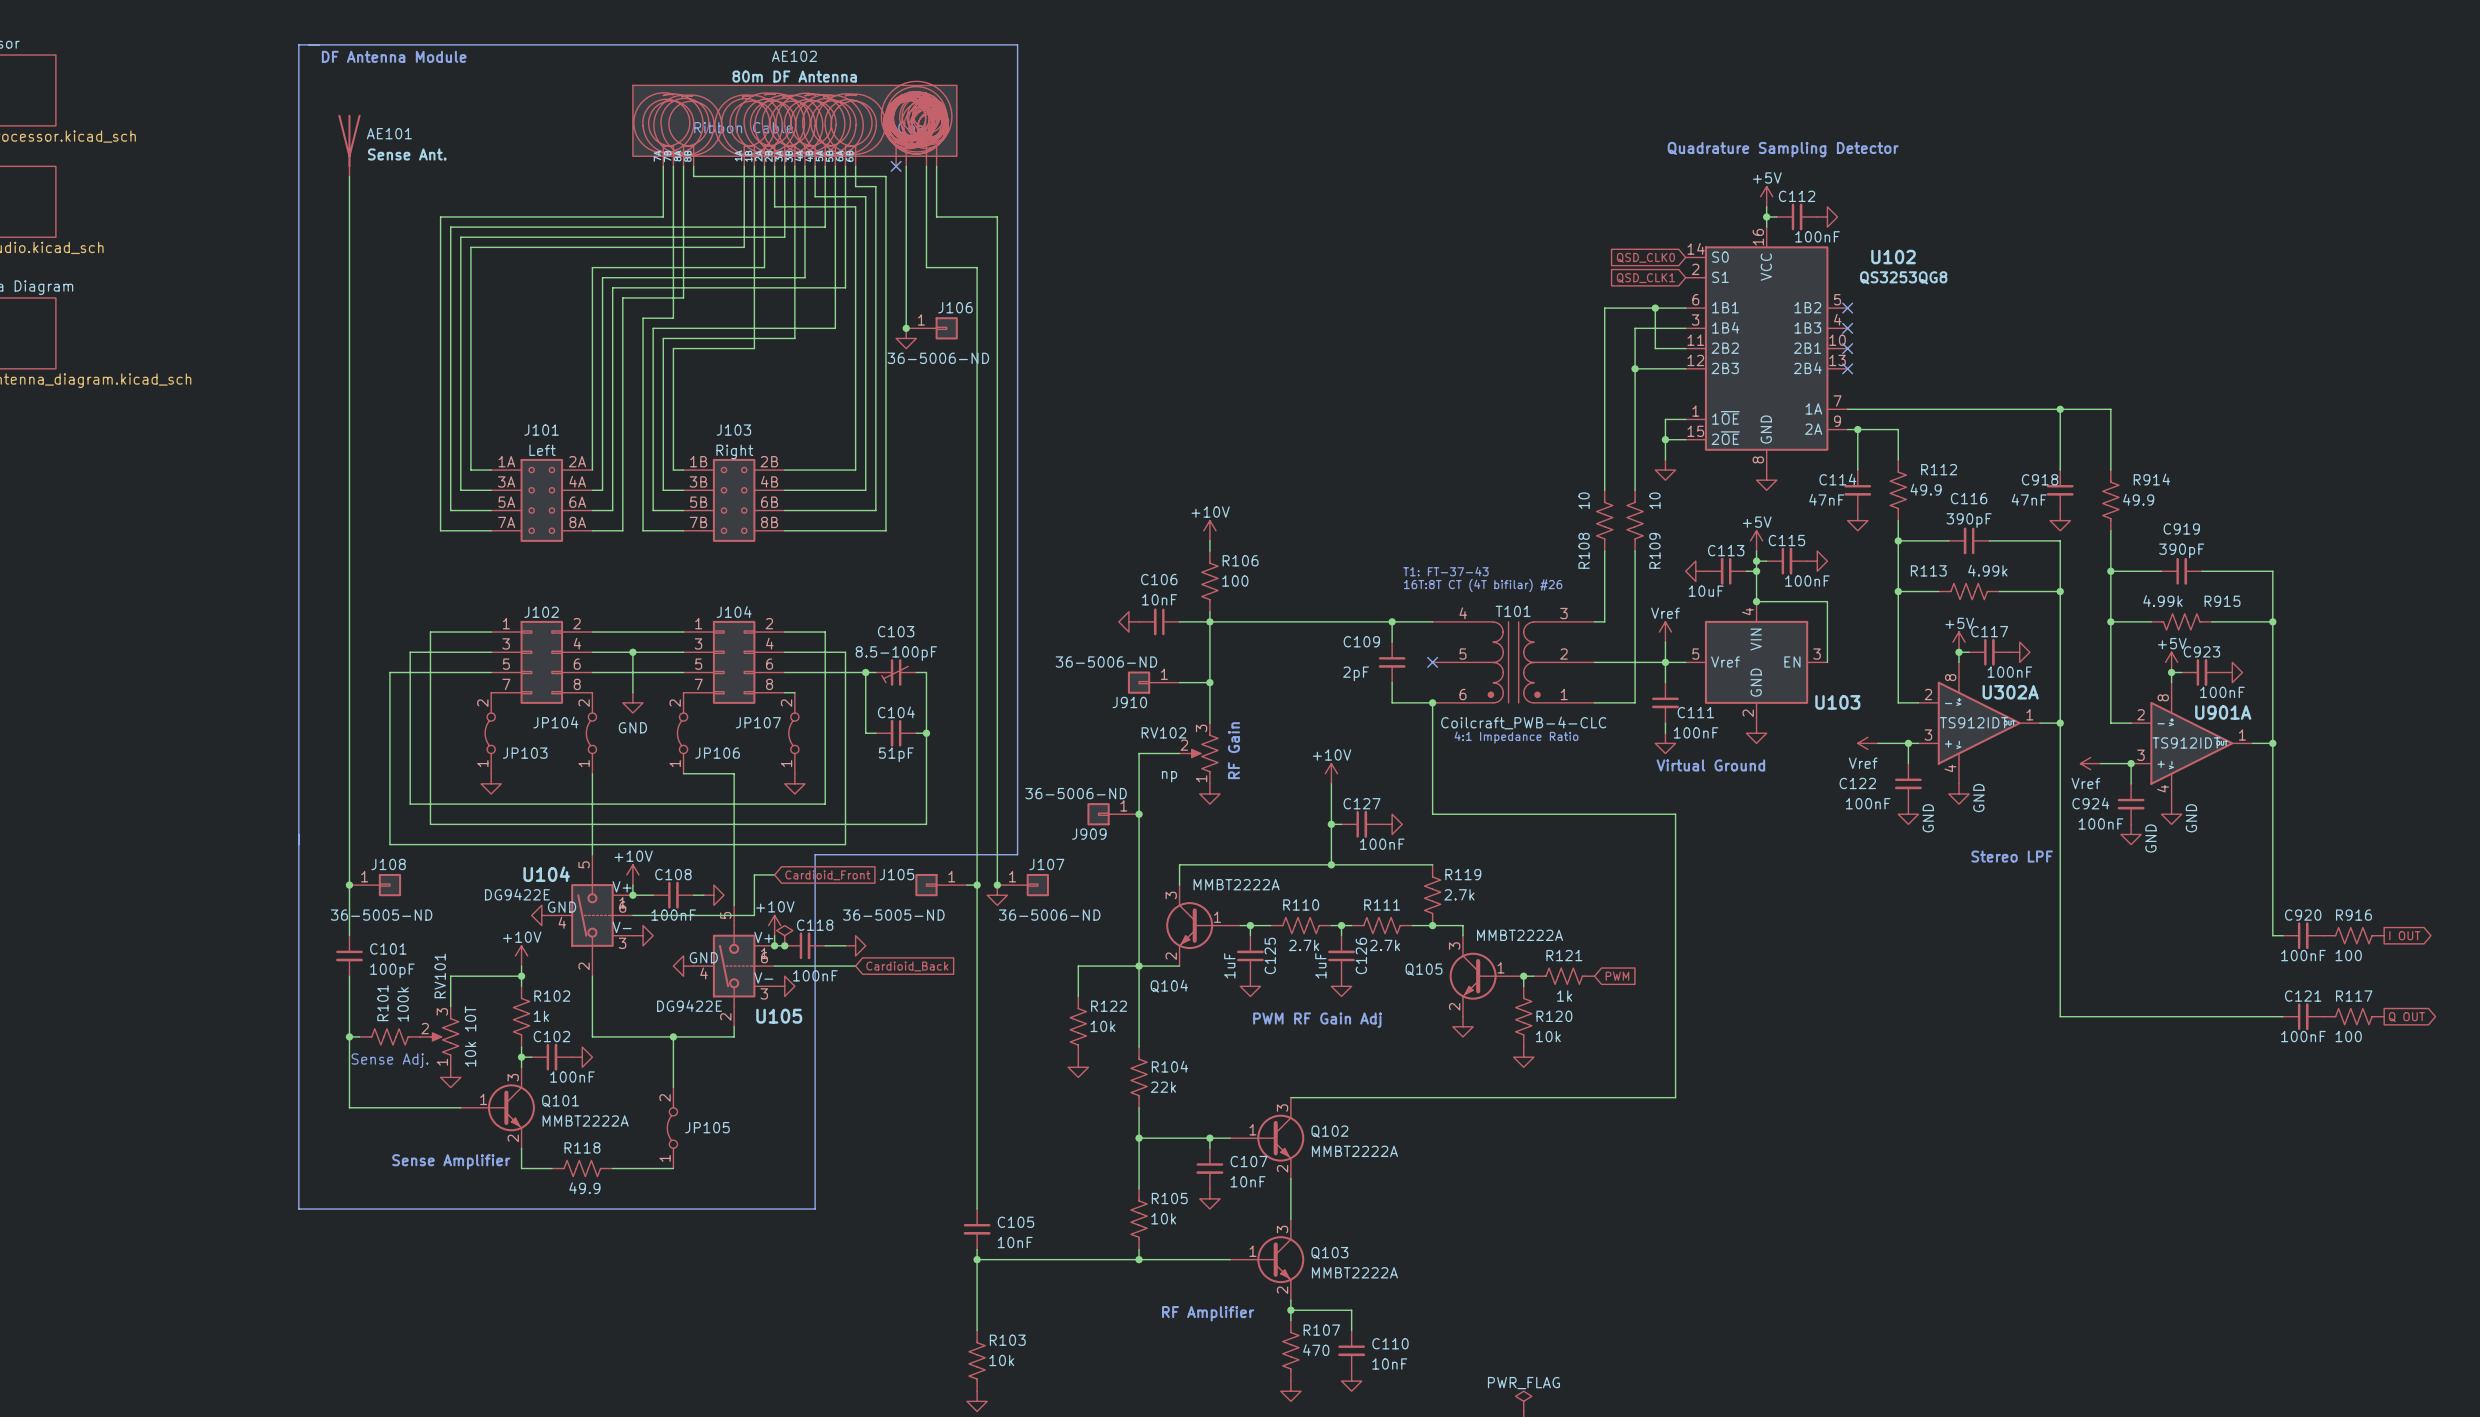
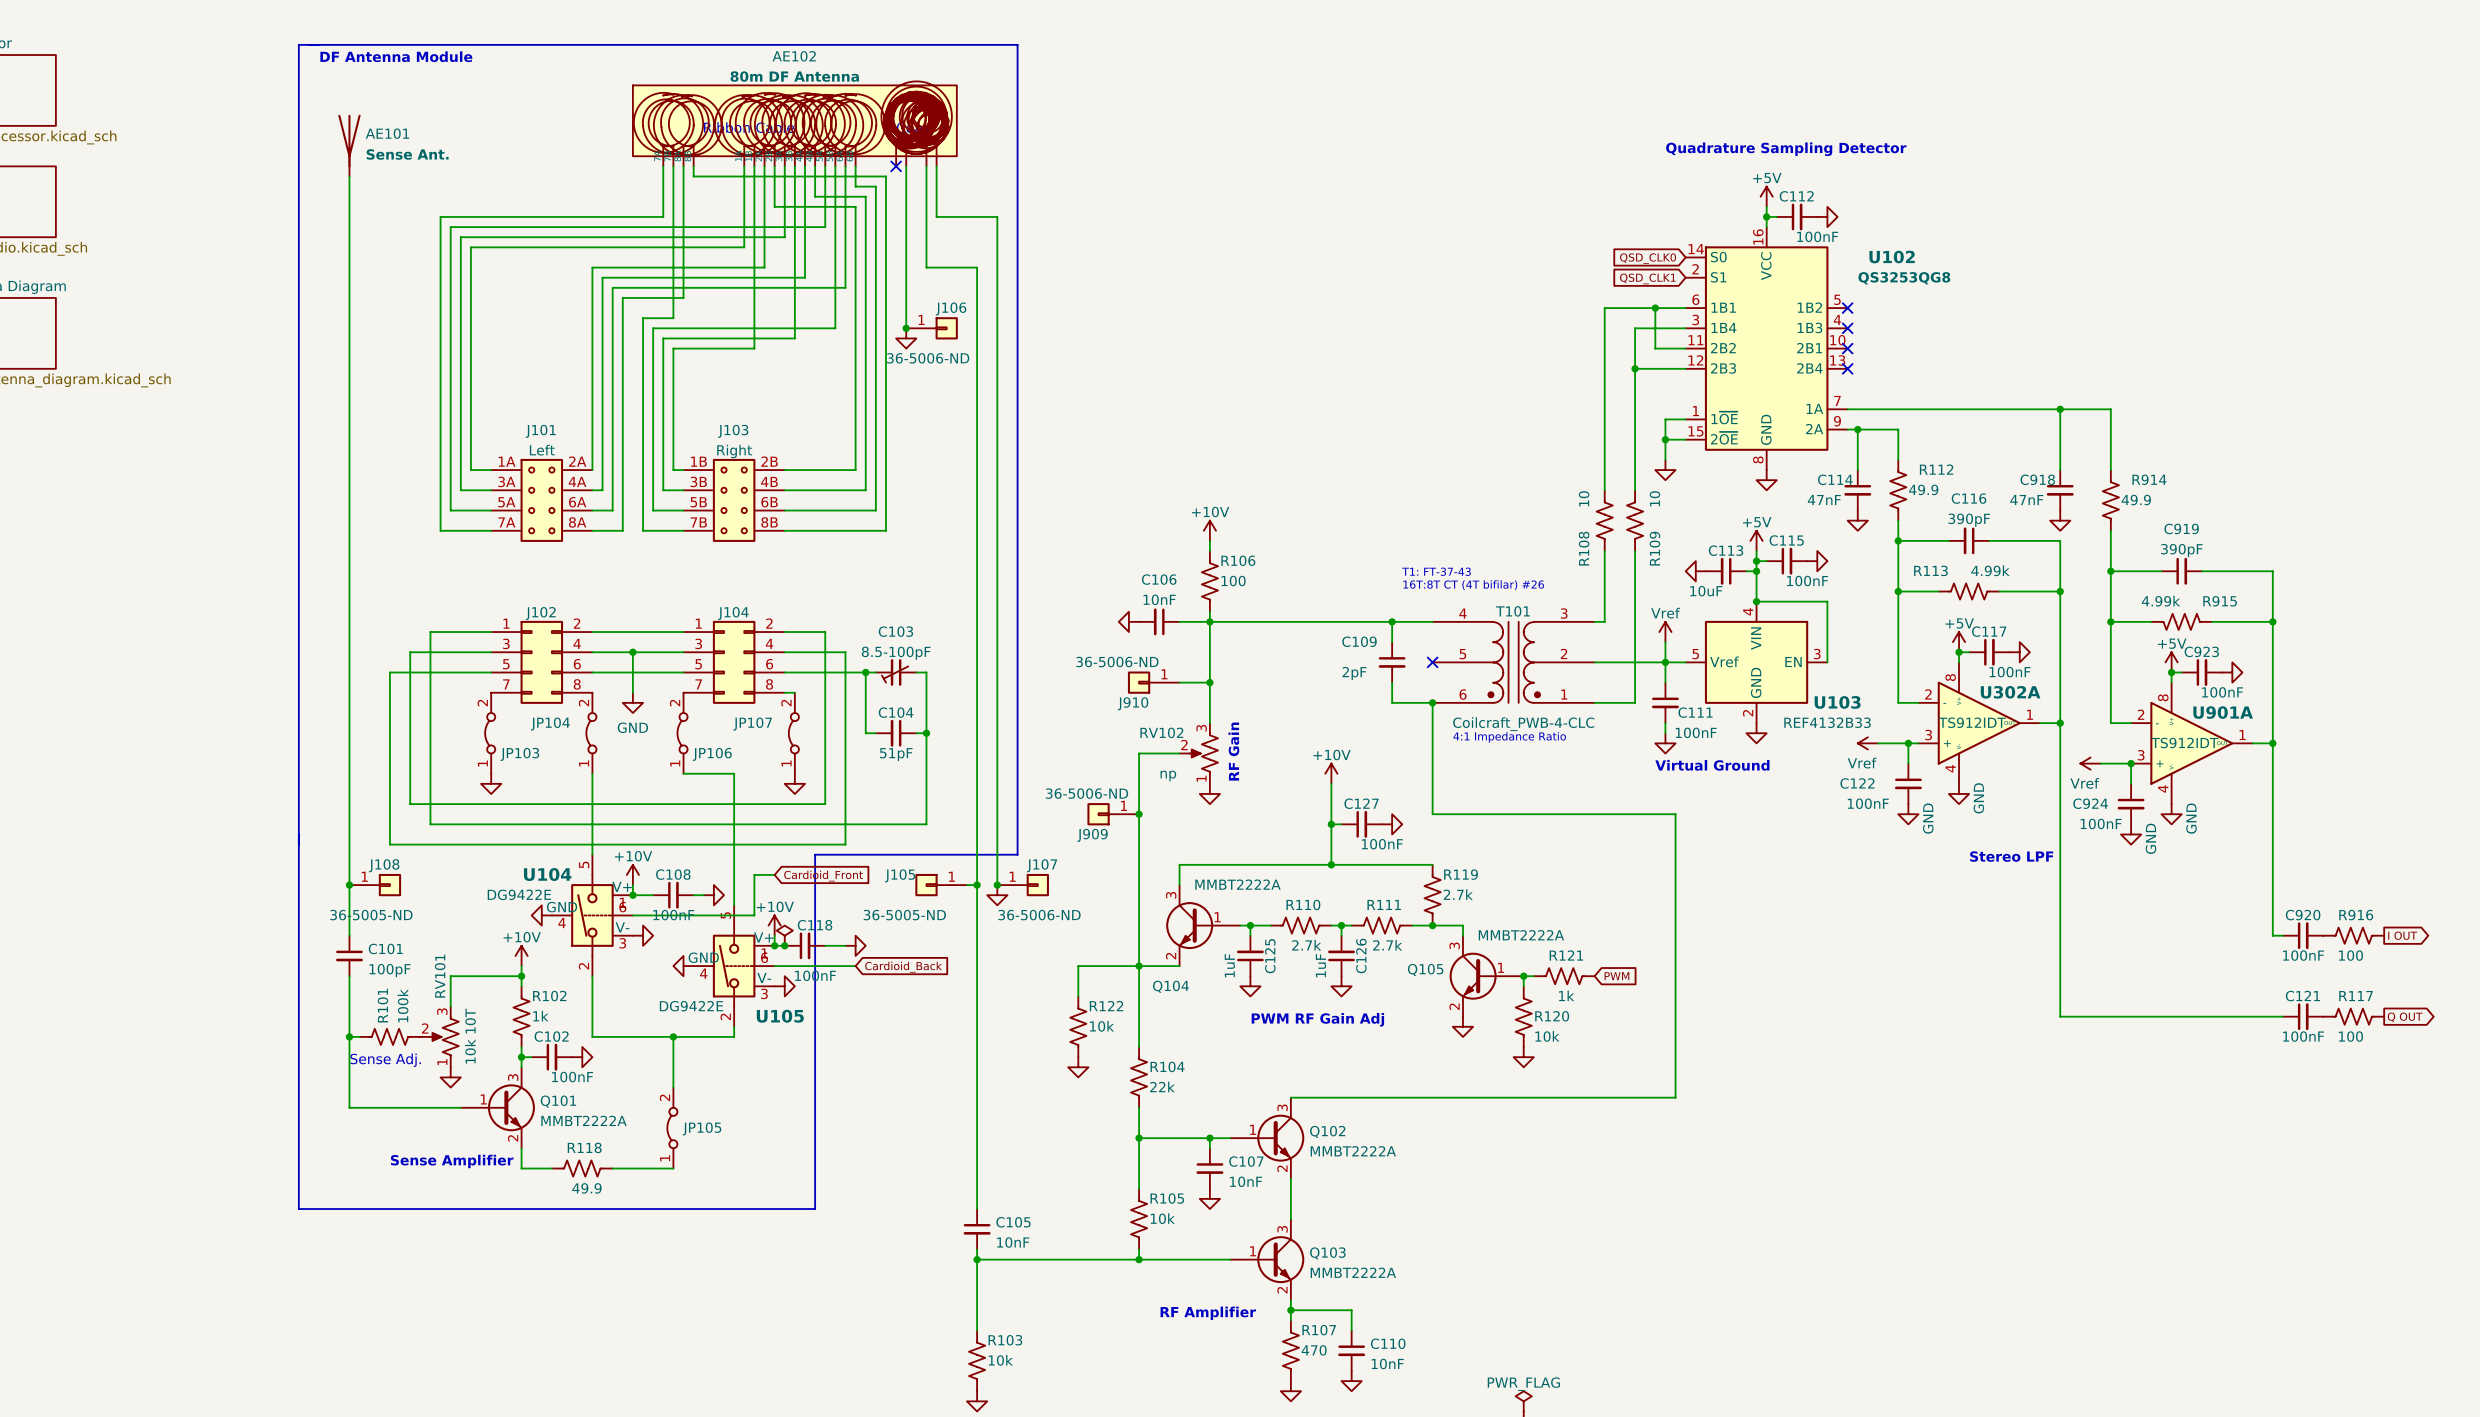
U103 value: none -> REF4132B33 (1827, 722)

